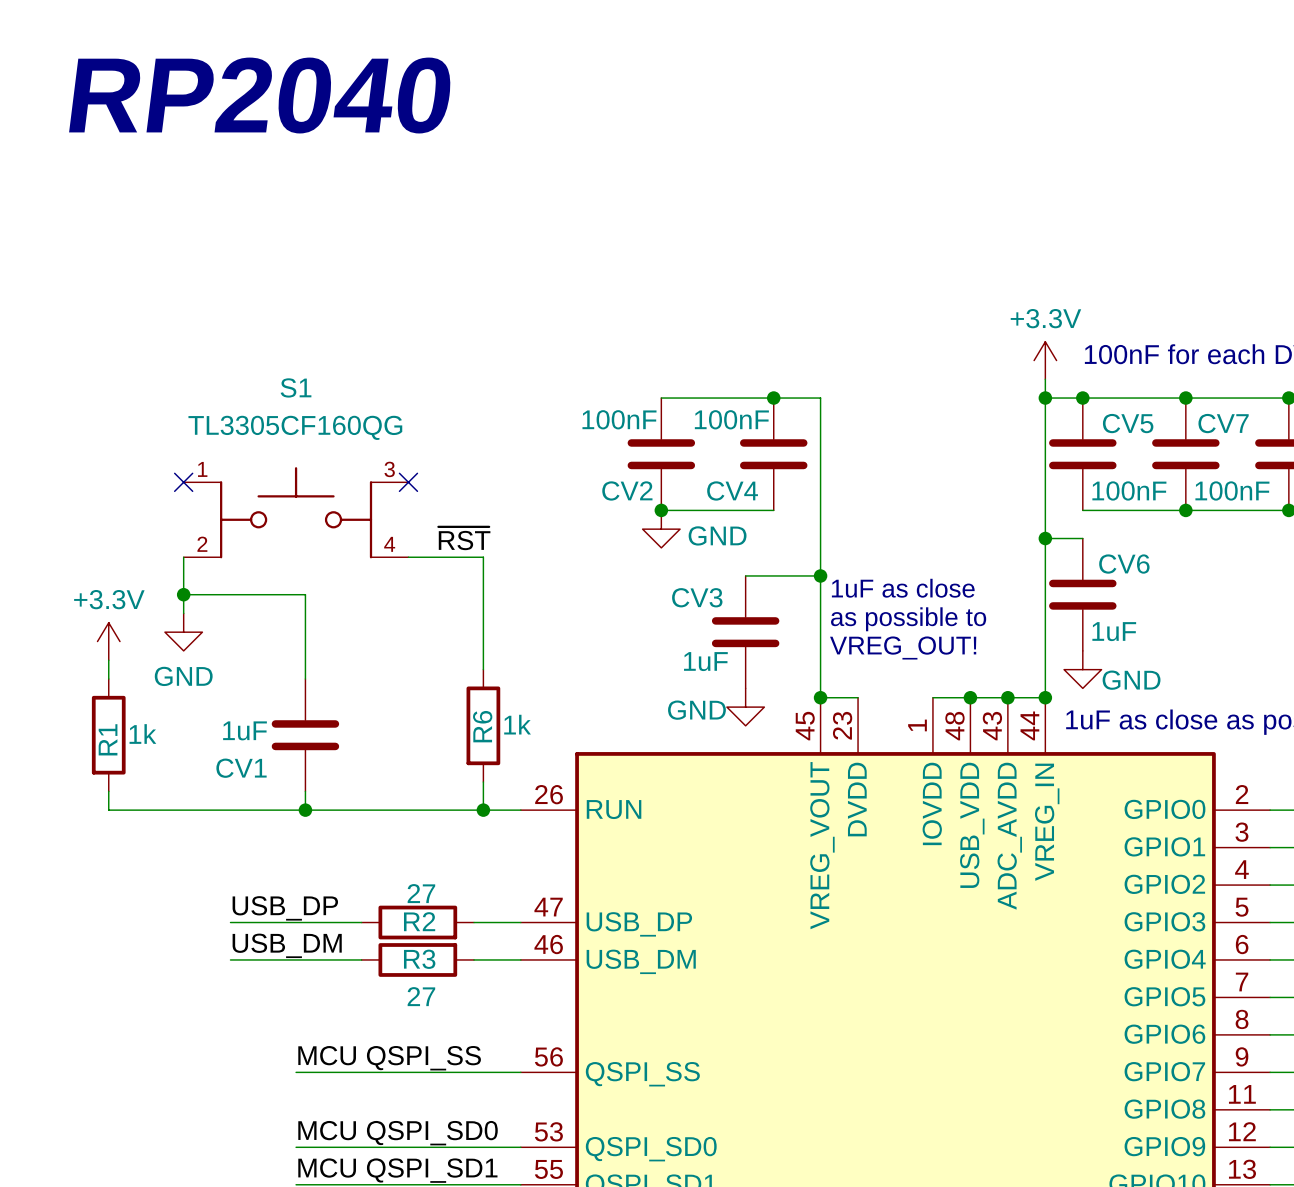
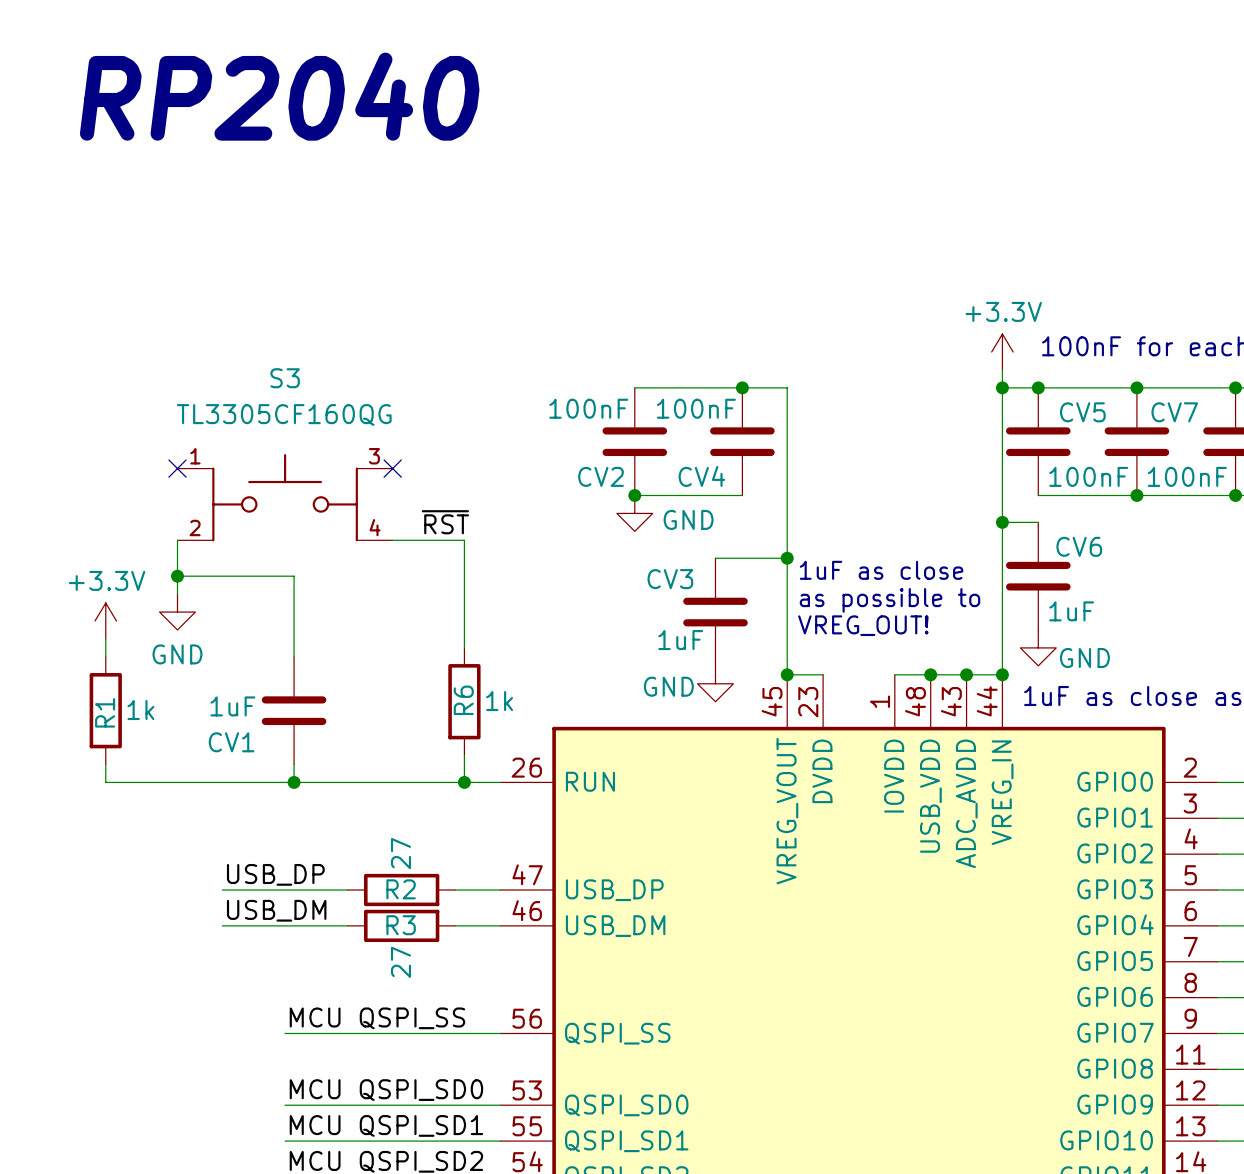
S1 name: S1 (296, 387) -> S3 (285, 378)
R2 value rotation: 0° (421, 893) -> 90° counterclockwise (400, 853)
R3 value rotation: 0° (421, 996) -> 90° counterclockwise (400, 962)

